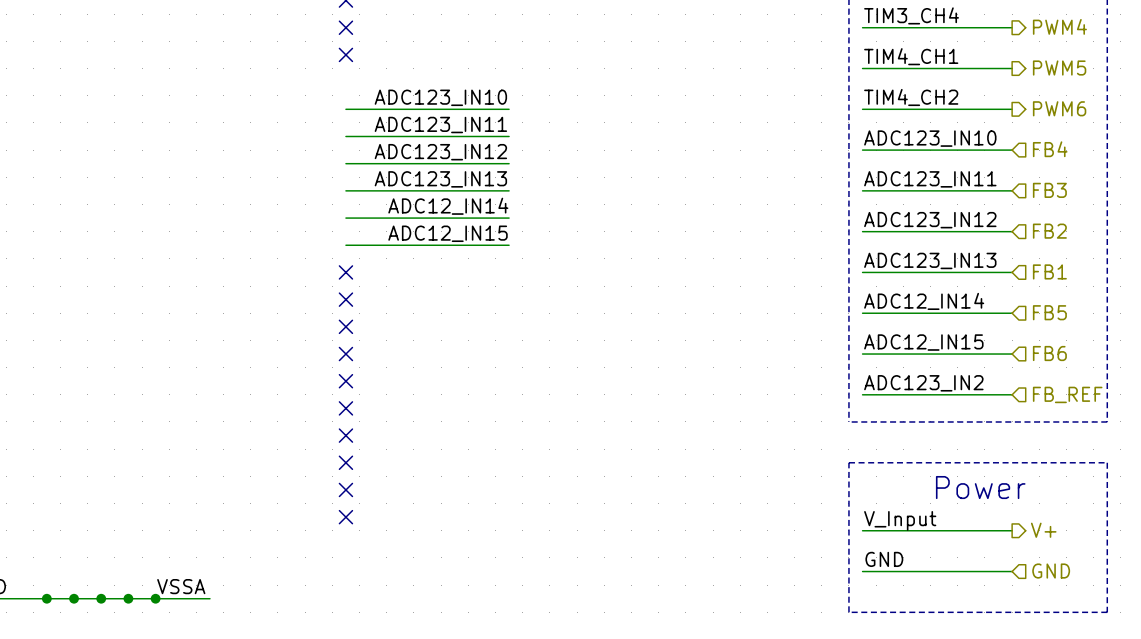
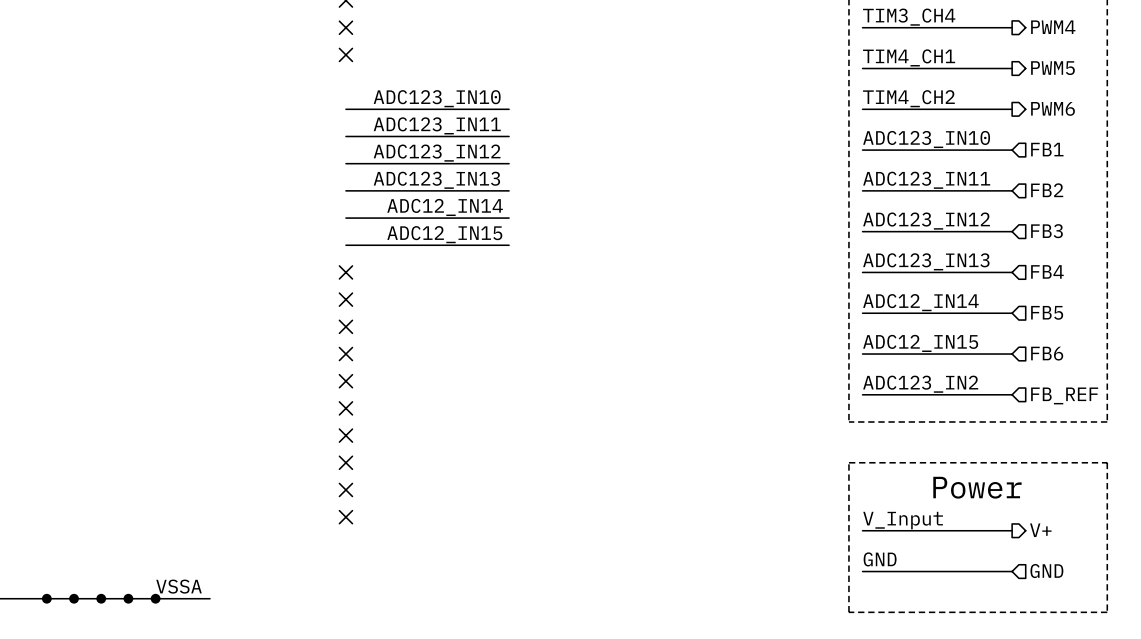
hierarchical label: FB4 (1050, 149) -> FB1 (1047, 149)
hierarchical label: FB3 (1049, 190) -> FB2 (1047, 190)
hierarchical label: FB2 (1049, 231) -> FB3 (1046, 231)
hierarchical label: FB1 (1049, 271) -> FB4 (1047, 271)

